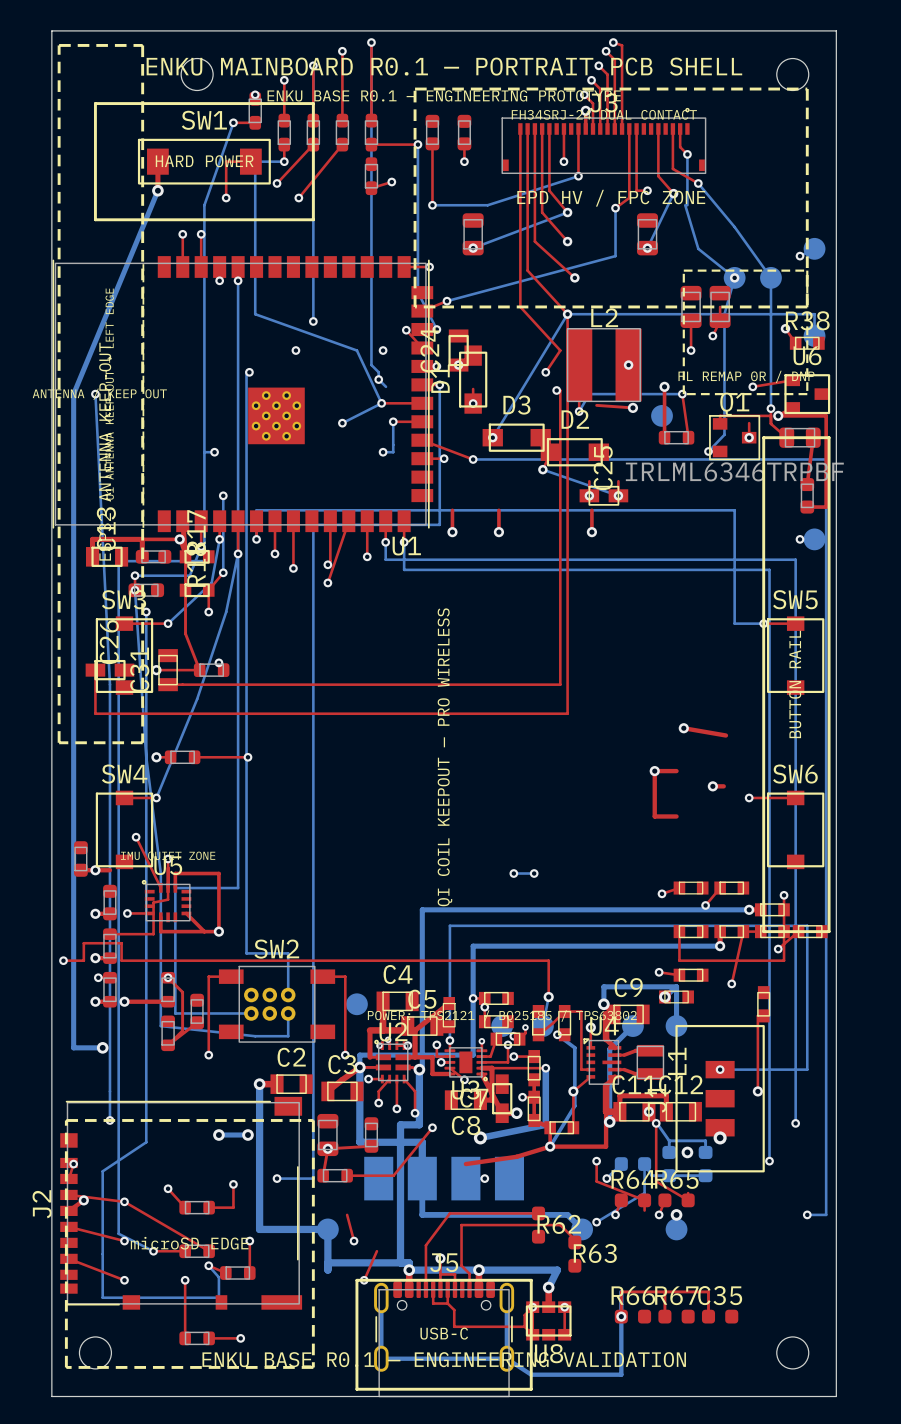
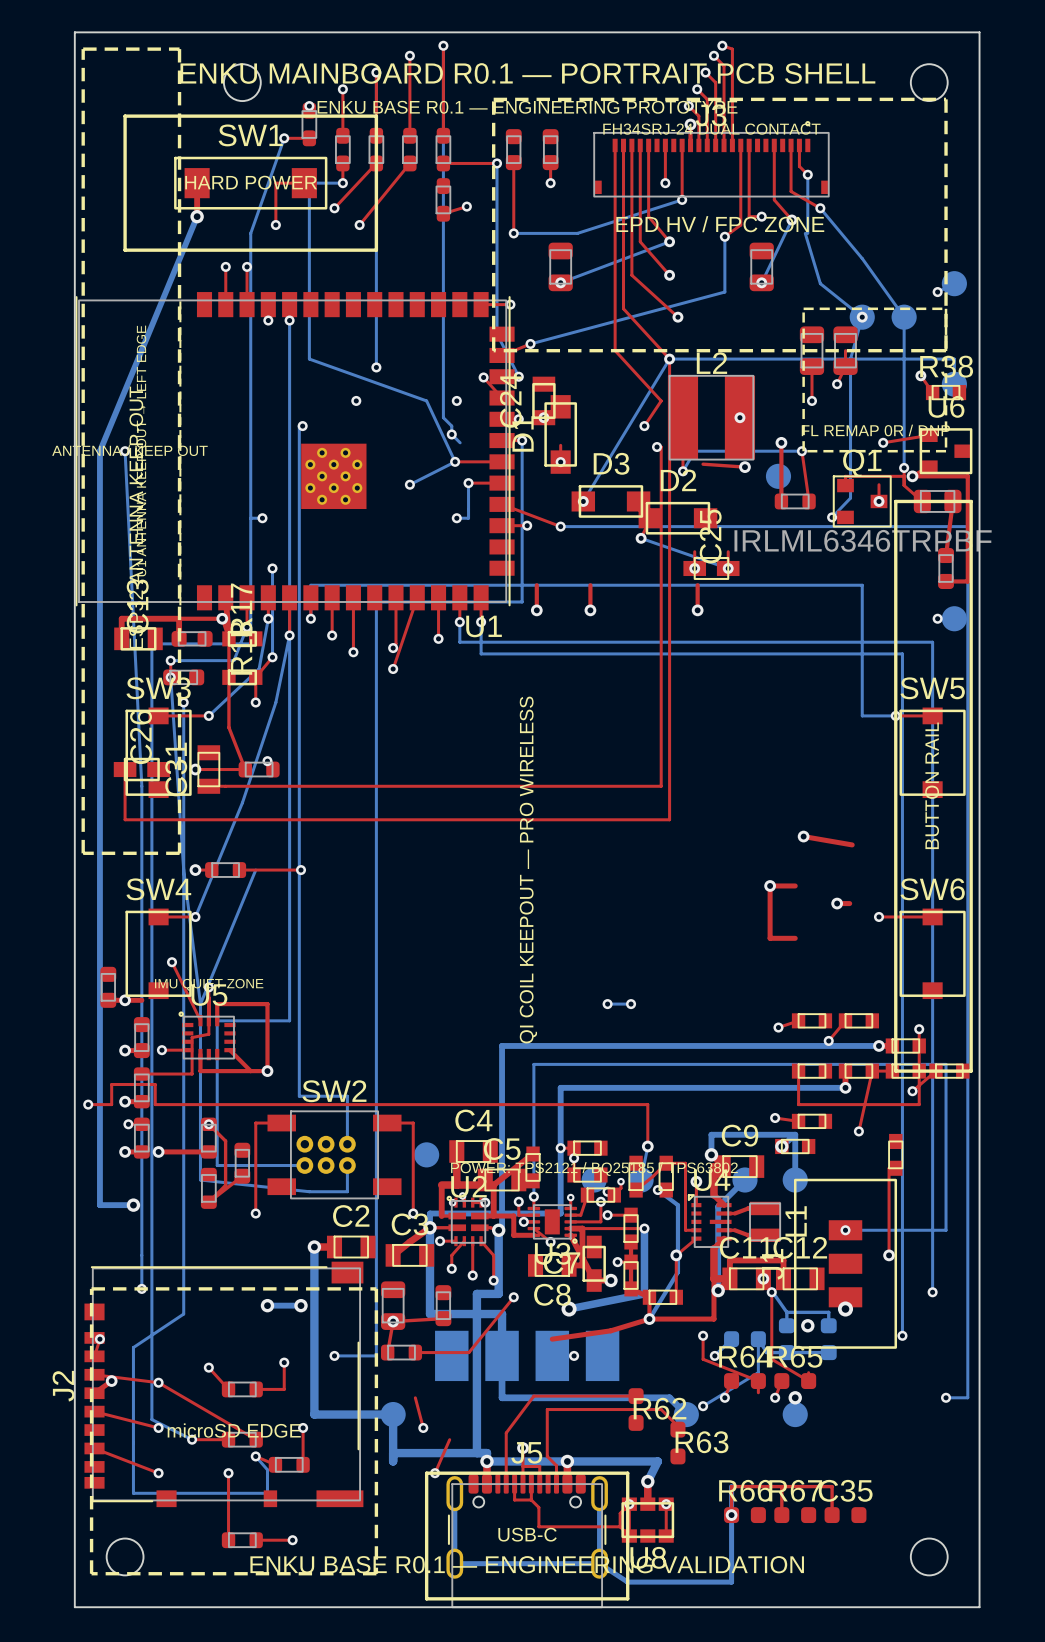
bottom track: none -> (255, 870) (200, 1004)

